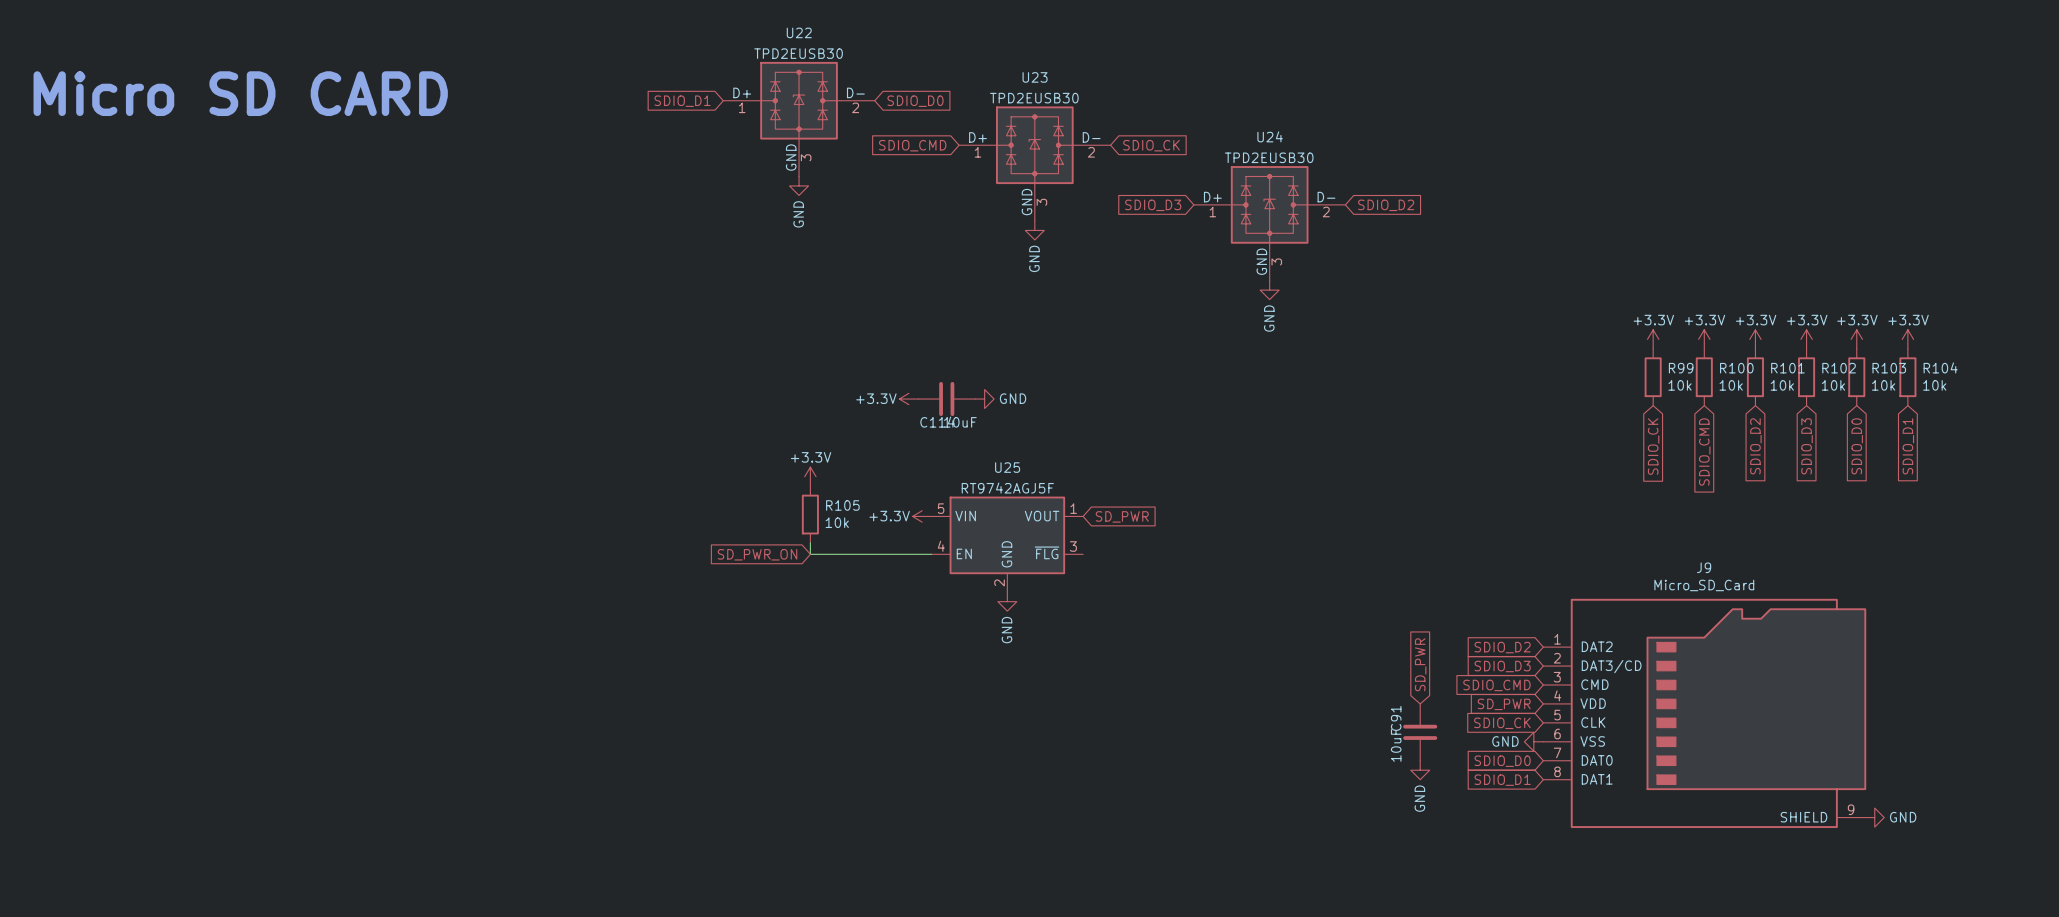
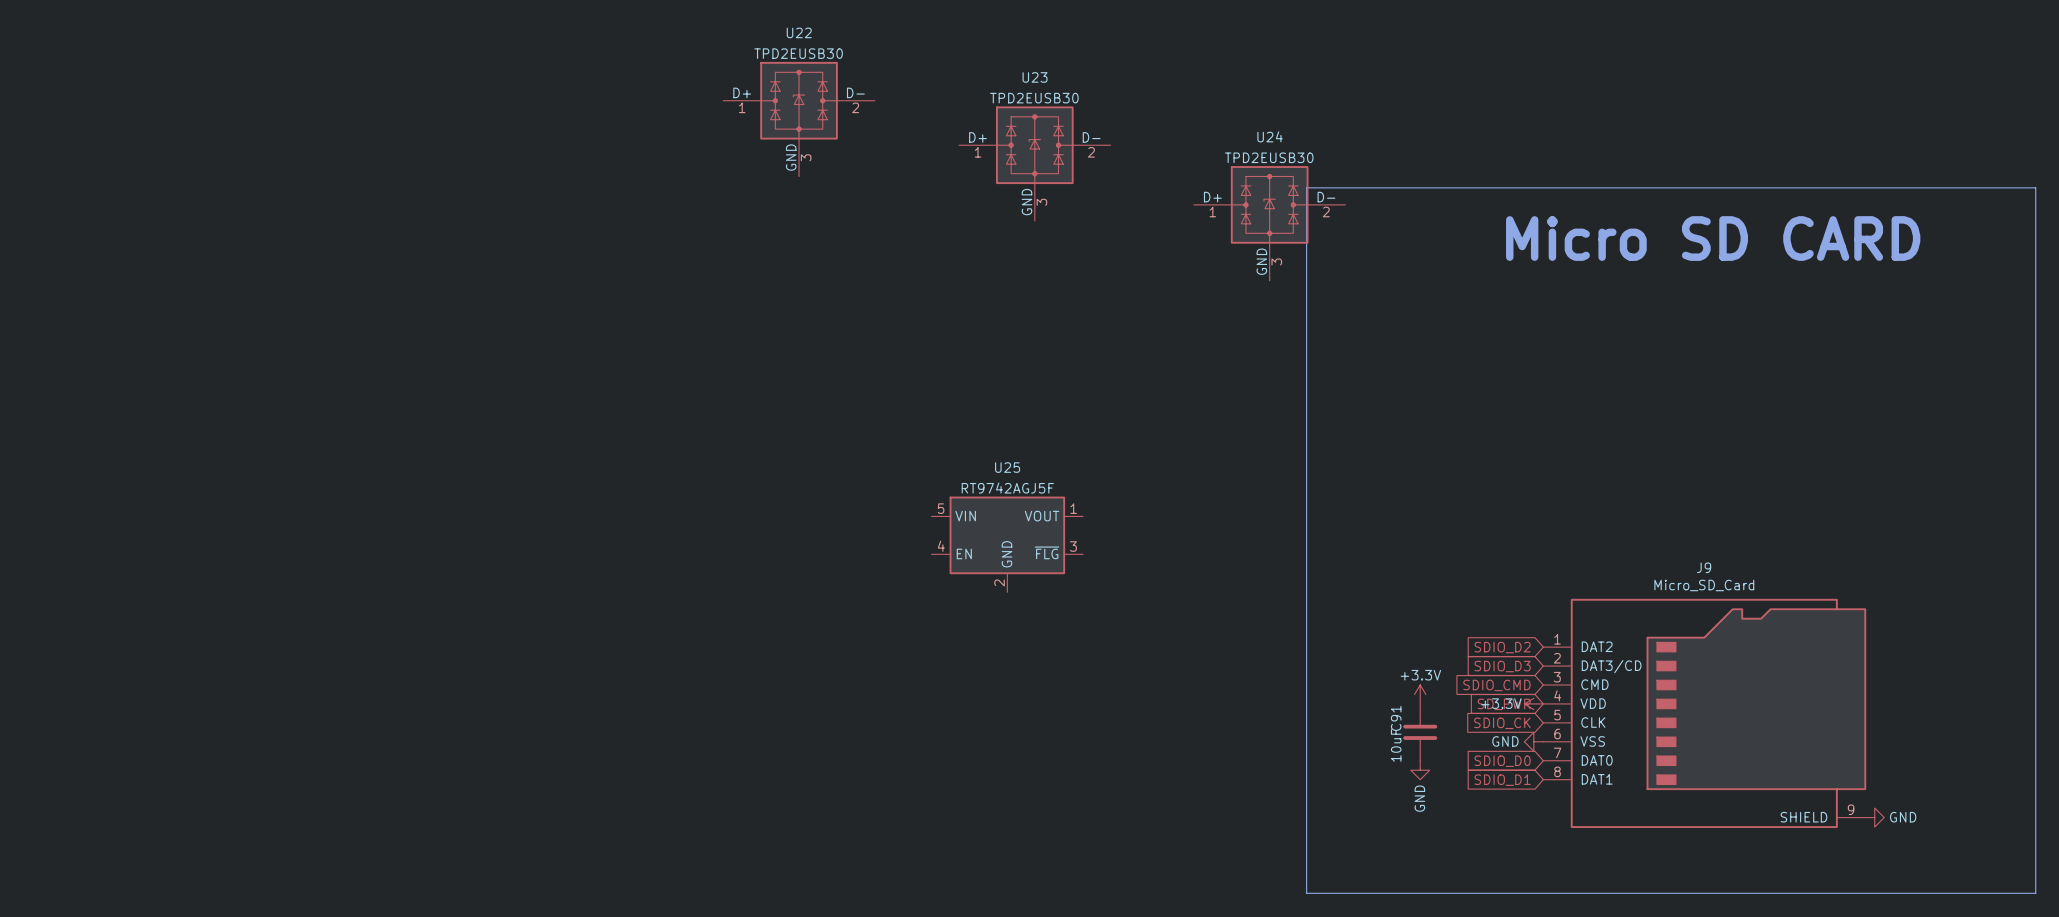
text: Micro SD CARD (240, 93) -> none
global label: SDIO_D1 (682, 101) -> none
global label: SDIO_D0 (915, 101) -> none
global label: SDIO_CMD (912, 145) -> none
global label: SDIO_CK (1151, 145) -> none
power symbol: GND (799, 185) -> none
line: none -> (1306, 187) (1306, 893) (2035, 893) (2035, 187) (1306, 187)
global label: SDIO_D3 (1153, 205) -> none
global label: SDIO_D2 (1386, 205) -> none
power symbol: GND (1034, 230) -> none
text: none -> Micro SD CARD (1713, 238)
power symbol: GND (1269, 290) -> none
power symbol: +3.3V (1653, 339) -> none
power symbol: +3.3V (1704, 339) -> none
power symbol: +3.3V (1755, 339) -> none
power symbol: +3.3V (1806, 339) -> none
power symbol: +3.3V (1856, 339) -> none
power symbol: +3.3V (1907, 339) -> none
R99: 10k (1653, 377) -> none
R100: 10k (1704, 377) -> none
R101: 10k (1755, 377) -> none
R102: 10k (1806, 377) -> none
R103: 10k (1856, 377) -> none
R104: 10k (1907, 377) -> none
power symbol: +3.3V (908, 399) -> none
C114: 10uF (946, 399) -> none
power symbol: GND (984, 399) -> none
global label: SDIO_CK (1653, 446) -> none
global label: SDIO_D2 (1755, 446) -> none
global label: SDIO_D3 (1807, 446) -> none
global label: SDIO_D0 (1857, 446) -> none
global label: SDIO_D1 (1908, 446) -> none
global label: SDIO_CMD (1704, 451) -> none
power symbol: +3.3V (810, 476) -> none
R105: 10k (810, 514) -> none
power symbol: +3.3V (922, 516) -> none
global label: SD_PWR (1122, 516) -> none
wire: (810, 542) (810, 554) (931, 554) -> none
global label: SD_PWR_ON (757, 554) -> none
power symbol: GND (1007, 601) -> none
global label: SD_PWR (1420, 664) -> none
power symbol: none -> +3.3V (1420, 694)
power symbol: none -> +3.3V (1533, 703)

